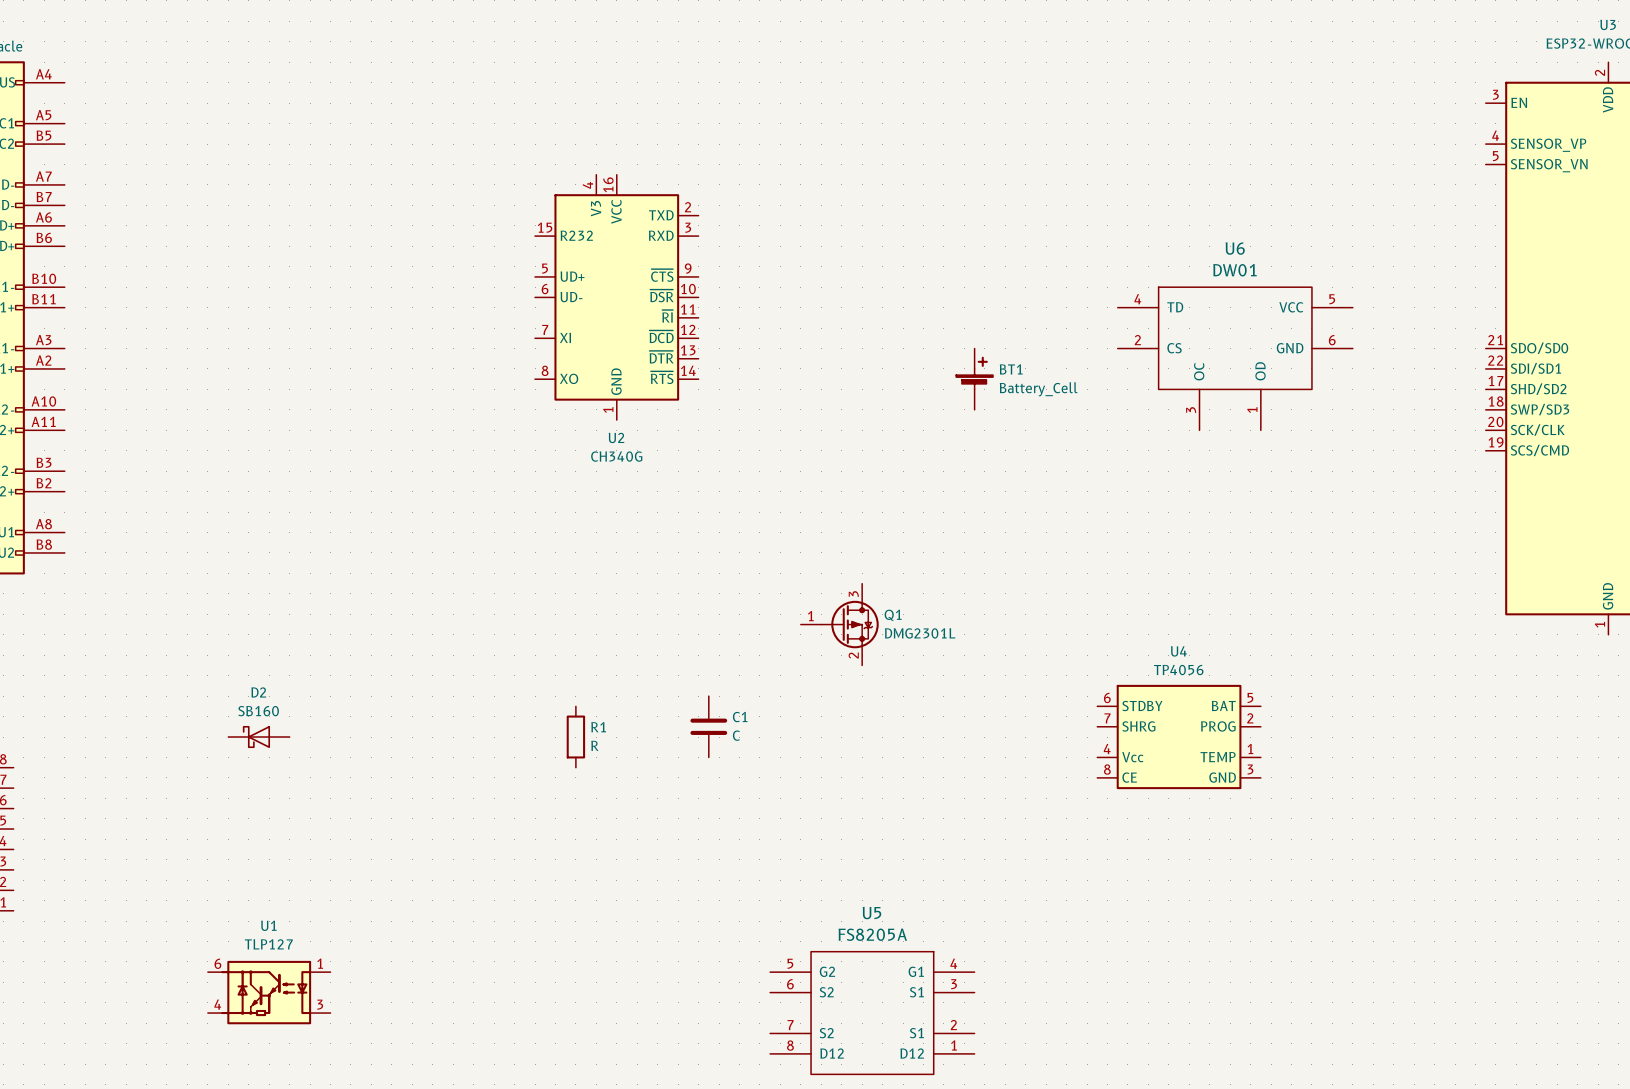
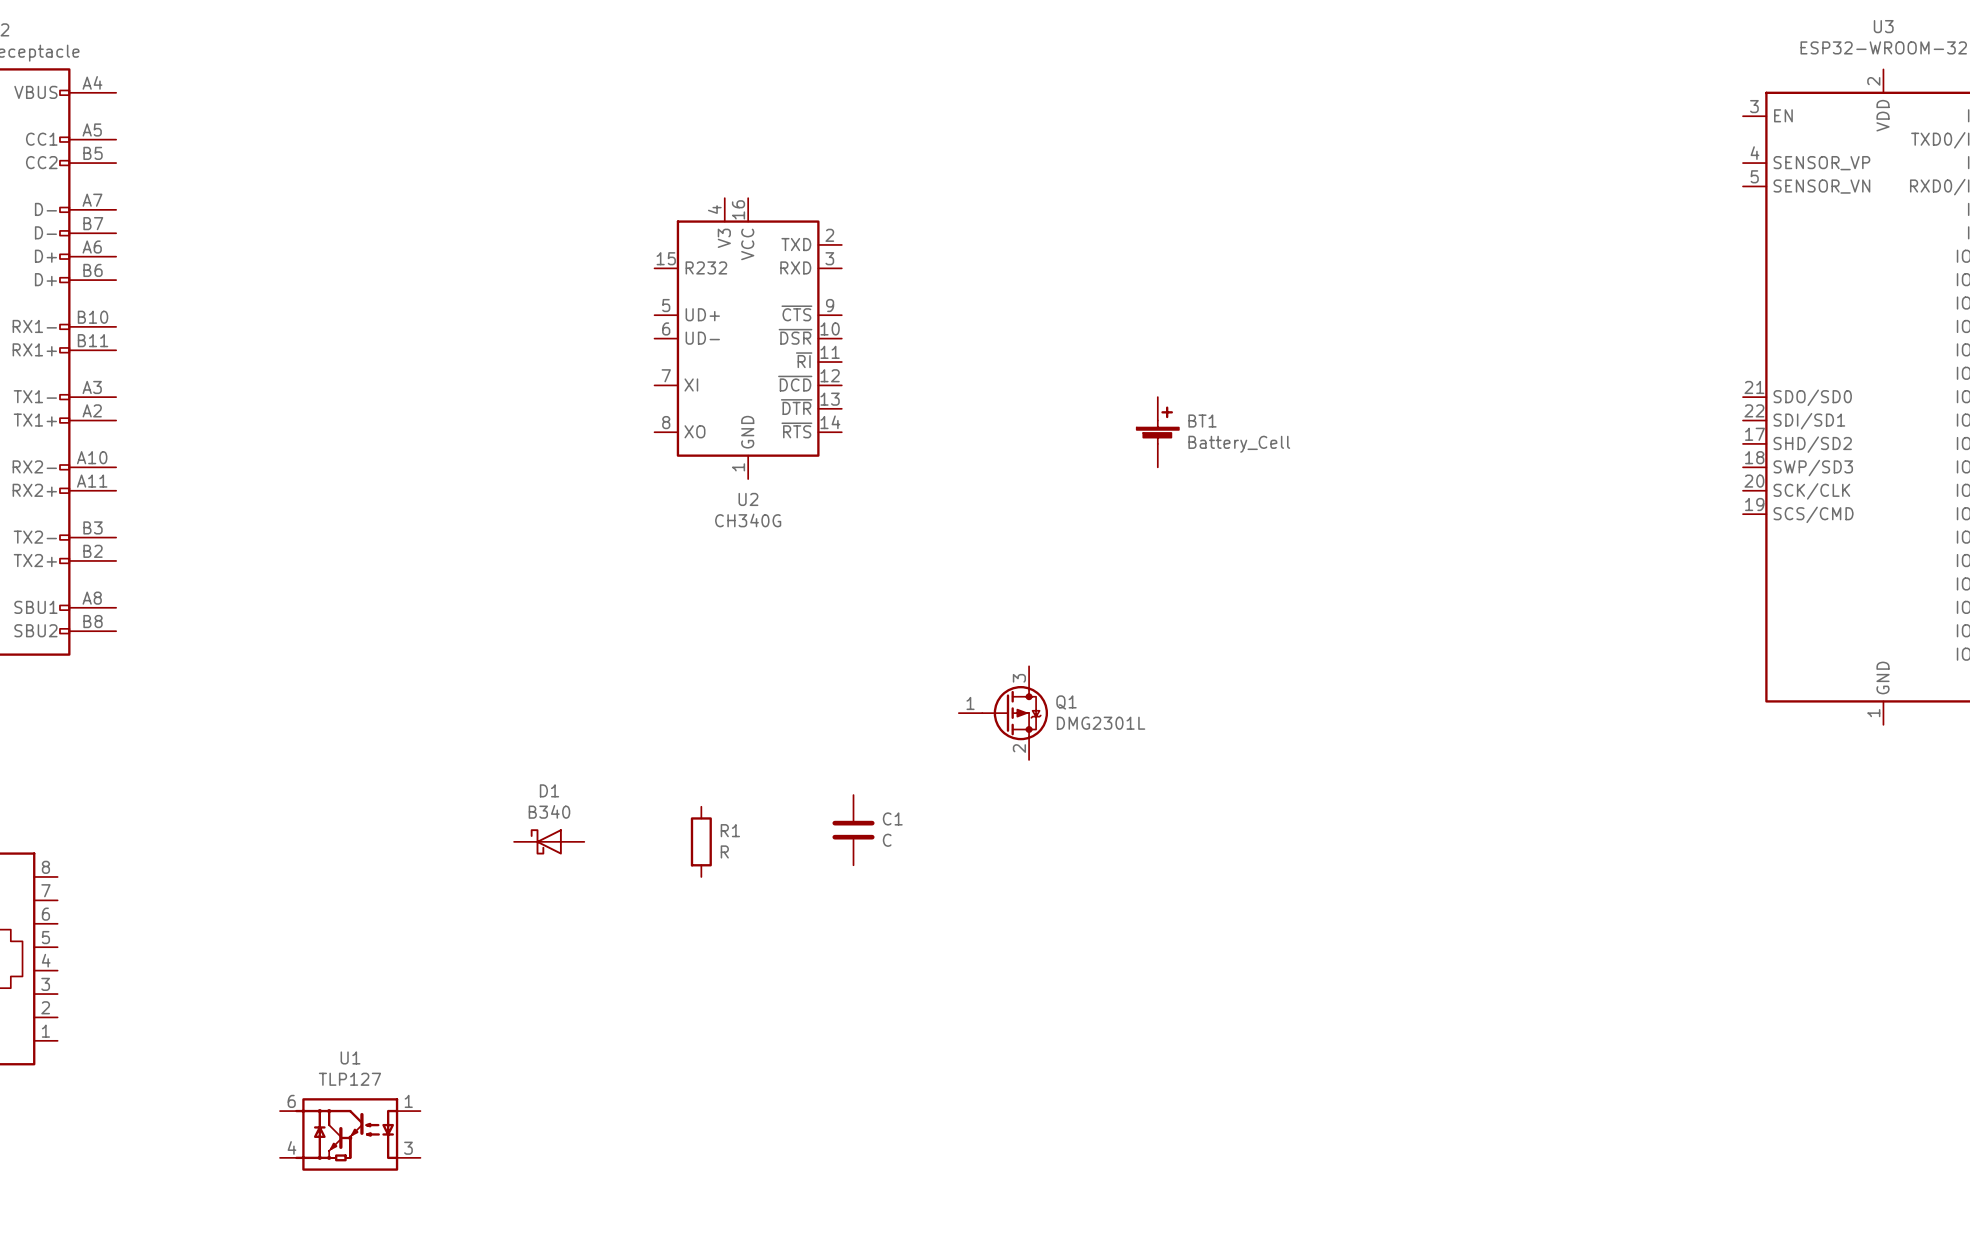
U6: DW01 (1235, 358) -> none
D2: SB160 (258, 737) -> none
D1: none -> B340 (549, 841)
U4: TP4056 (1179, 737) -> none
U5: FS8205A (872, 1013) -> none

